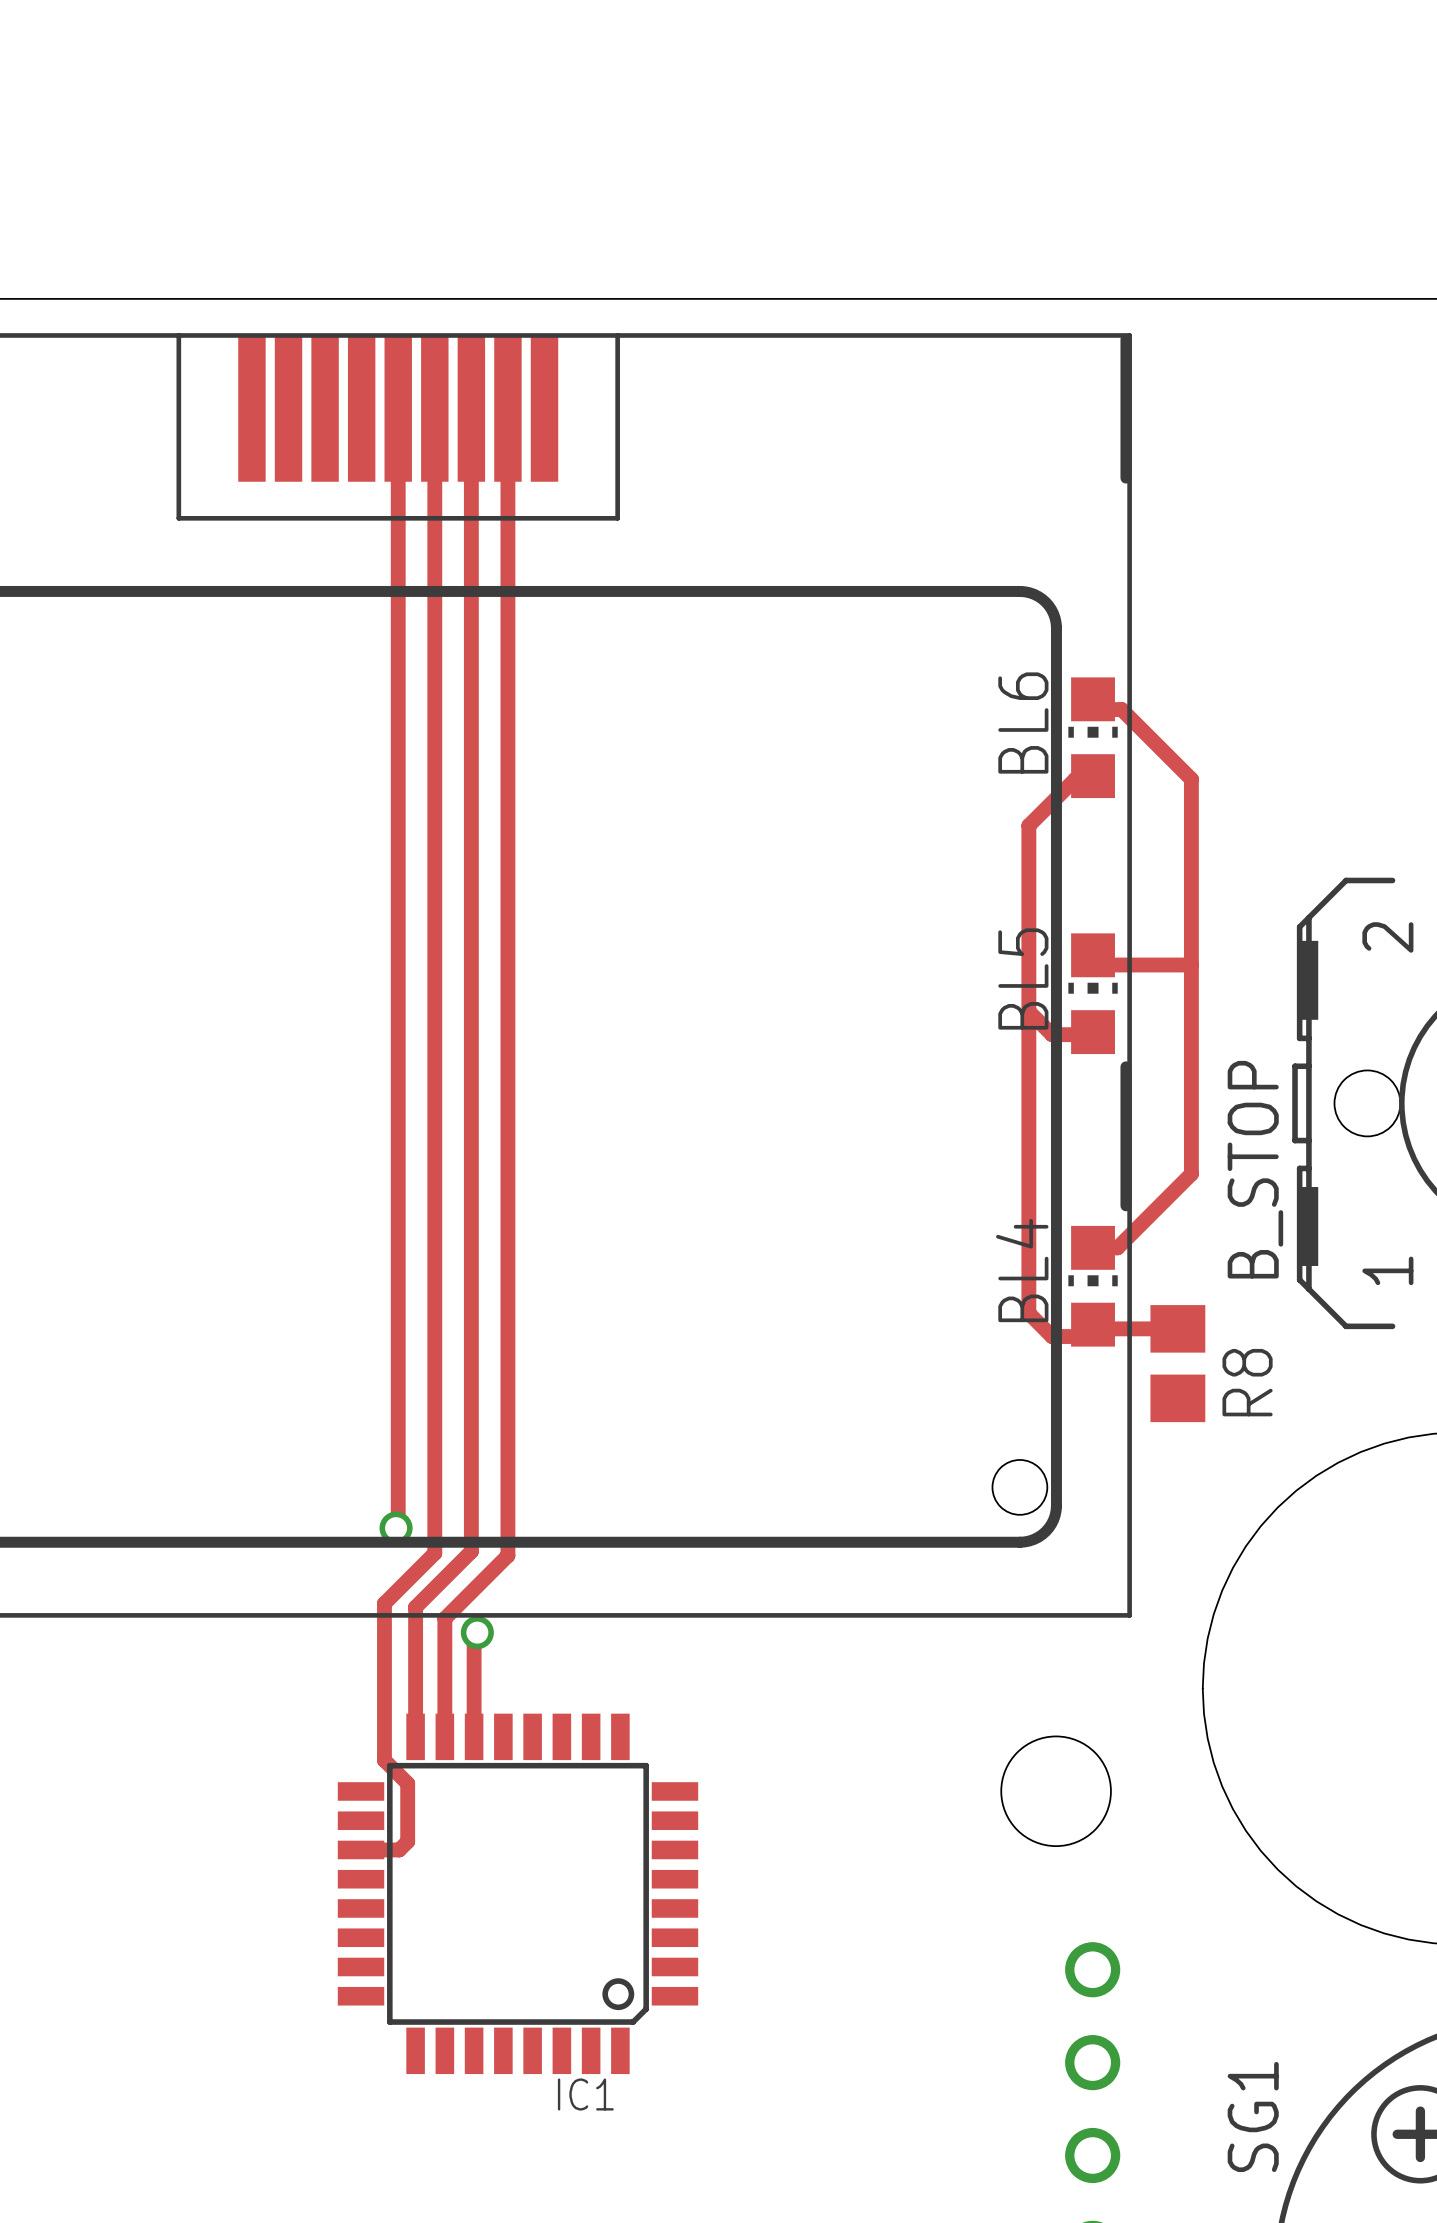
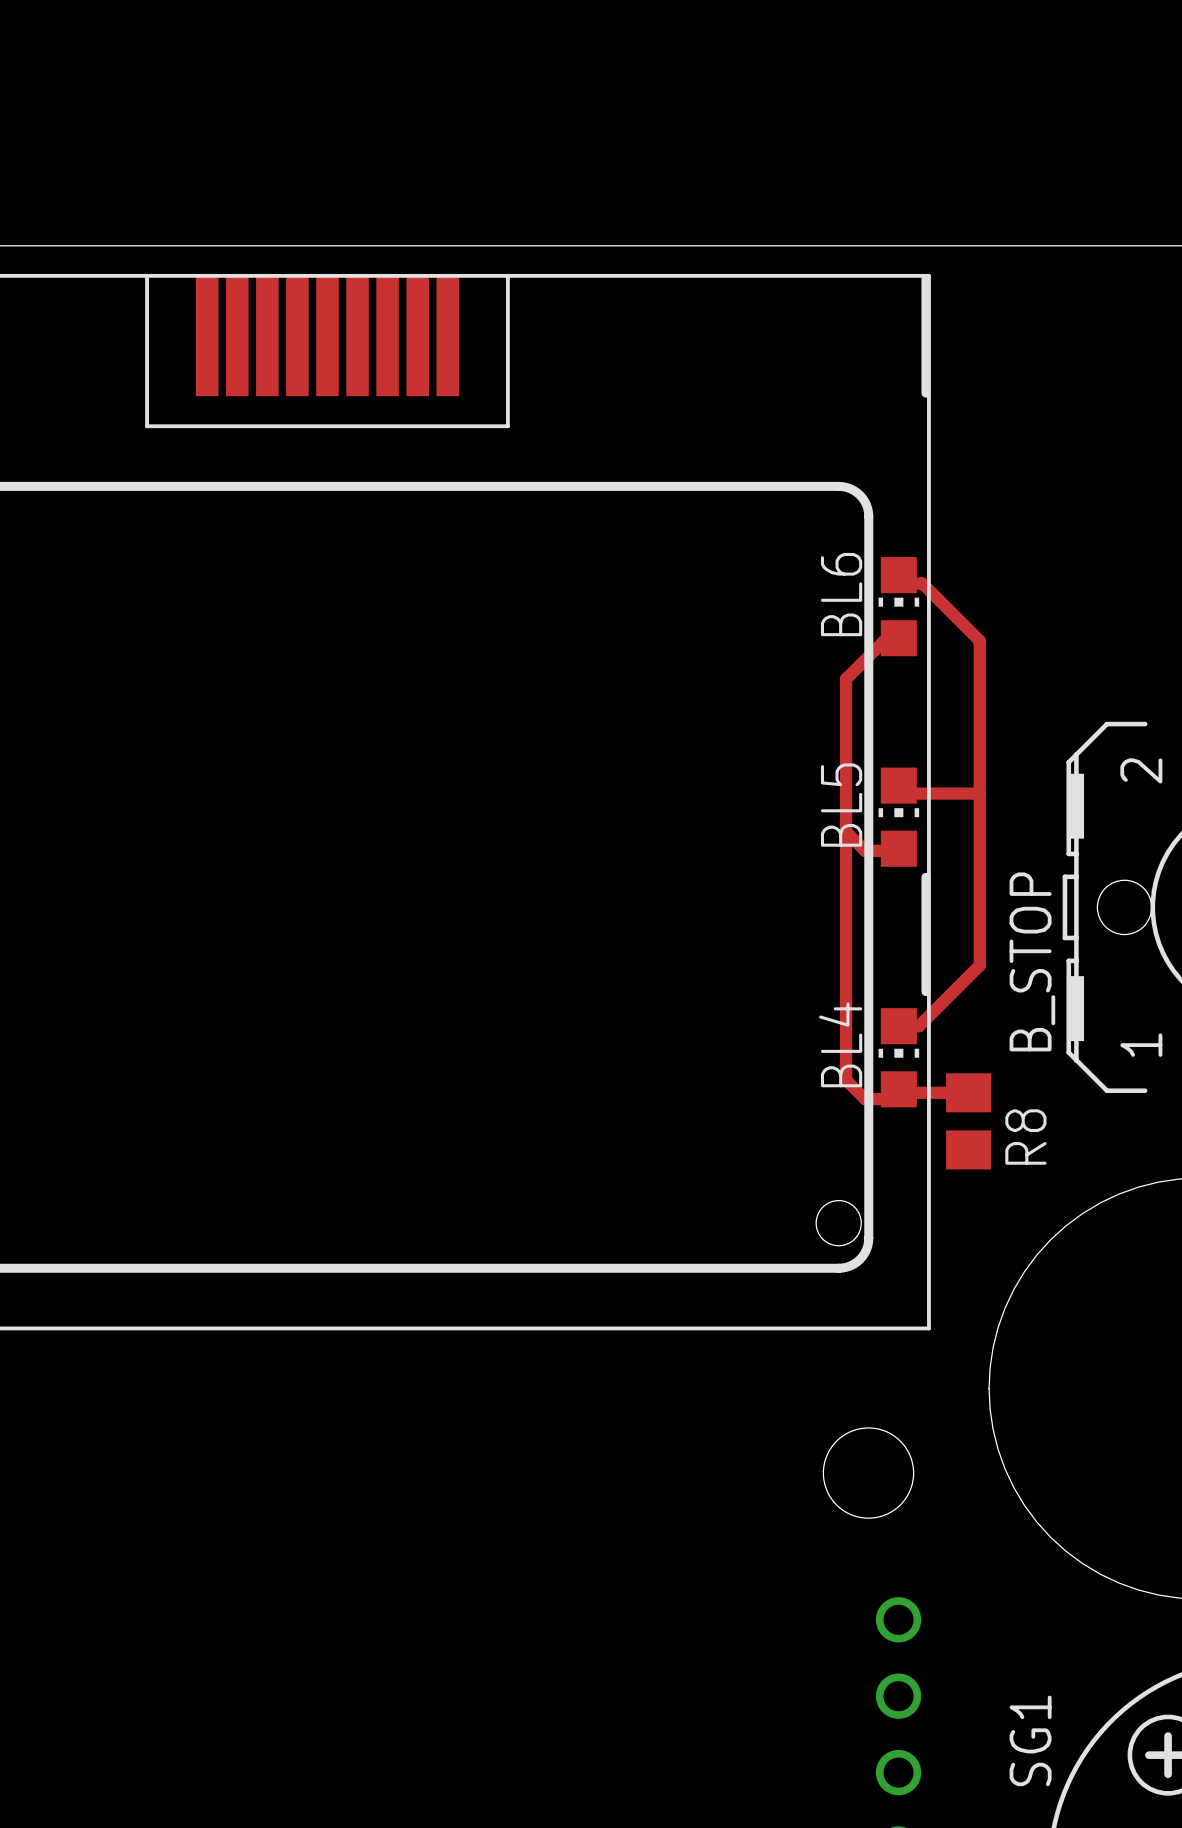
track: (398, 408) (398, 1525) (396, 1528) -> none
track: (434, 408) (434, 1553) (384, 1603) (384, 1760) (407, 1783) (407, 1841) (399, 1849) (361, 1849) -> none
track: (471, 408) (471, 1551) (415, 1607) (415, 1736) -> none
track: (507, 408) (507, 1555) (444, 1618) (444, 1736) -> none
via: (396, 1528) -> none
track: (477, 1632) (474, 1635) (474, 1736) -> none
via: (477, 1632) -> none
IC1: (517, 1893) -> none

